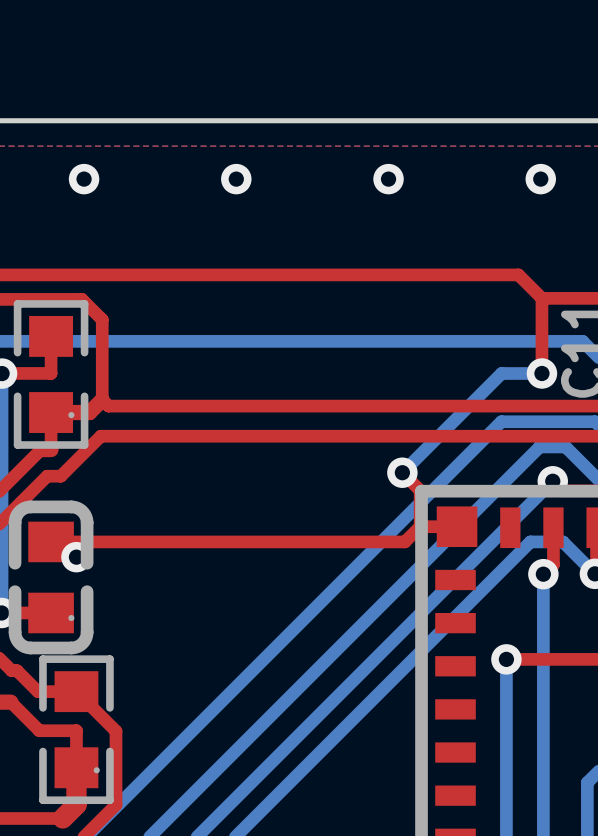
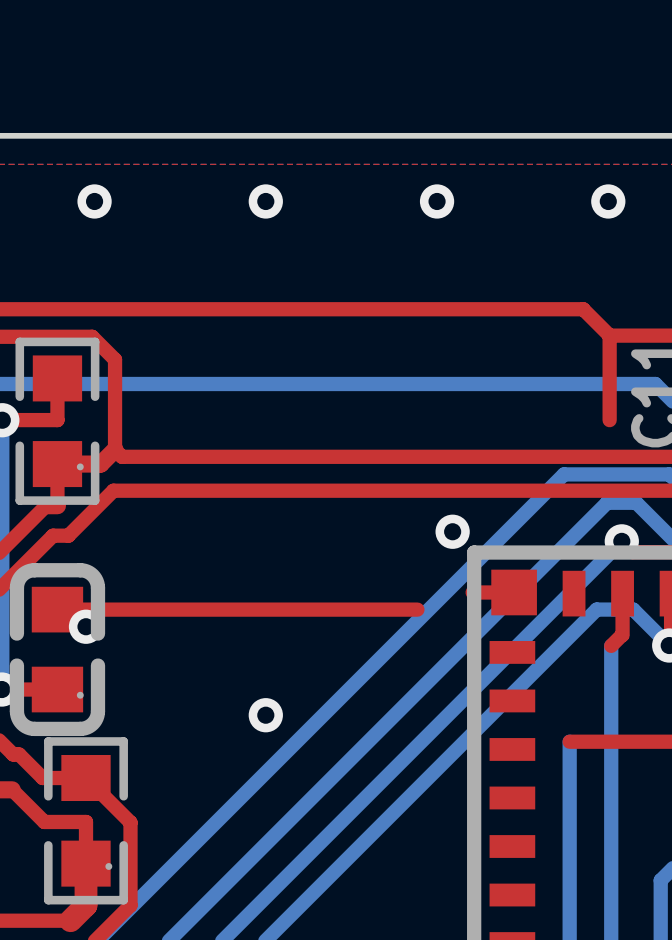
bottom track: (541, 373) (501, 373) (402, 472) -> none
via: (541, 373) -> none
top track: (402, 472) (420, 490) (420, 526) (404, 541) (371, 541) -> none
via: (543, 574) -> none
via: none -> (265, 715)
via: (506, 659) -> none

